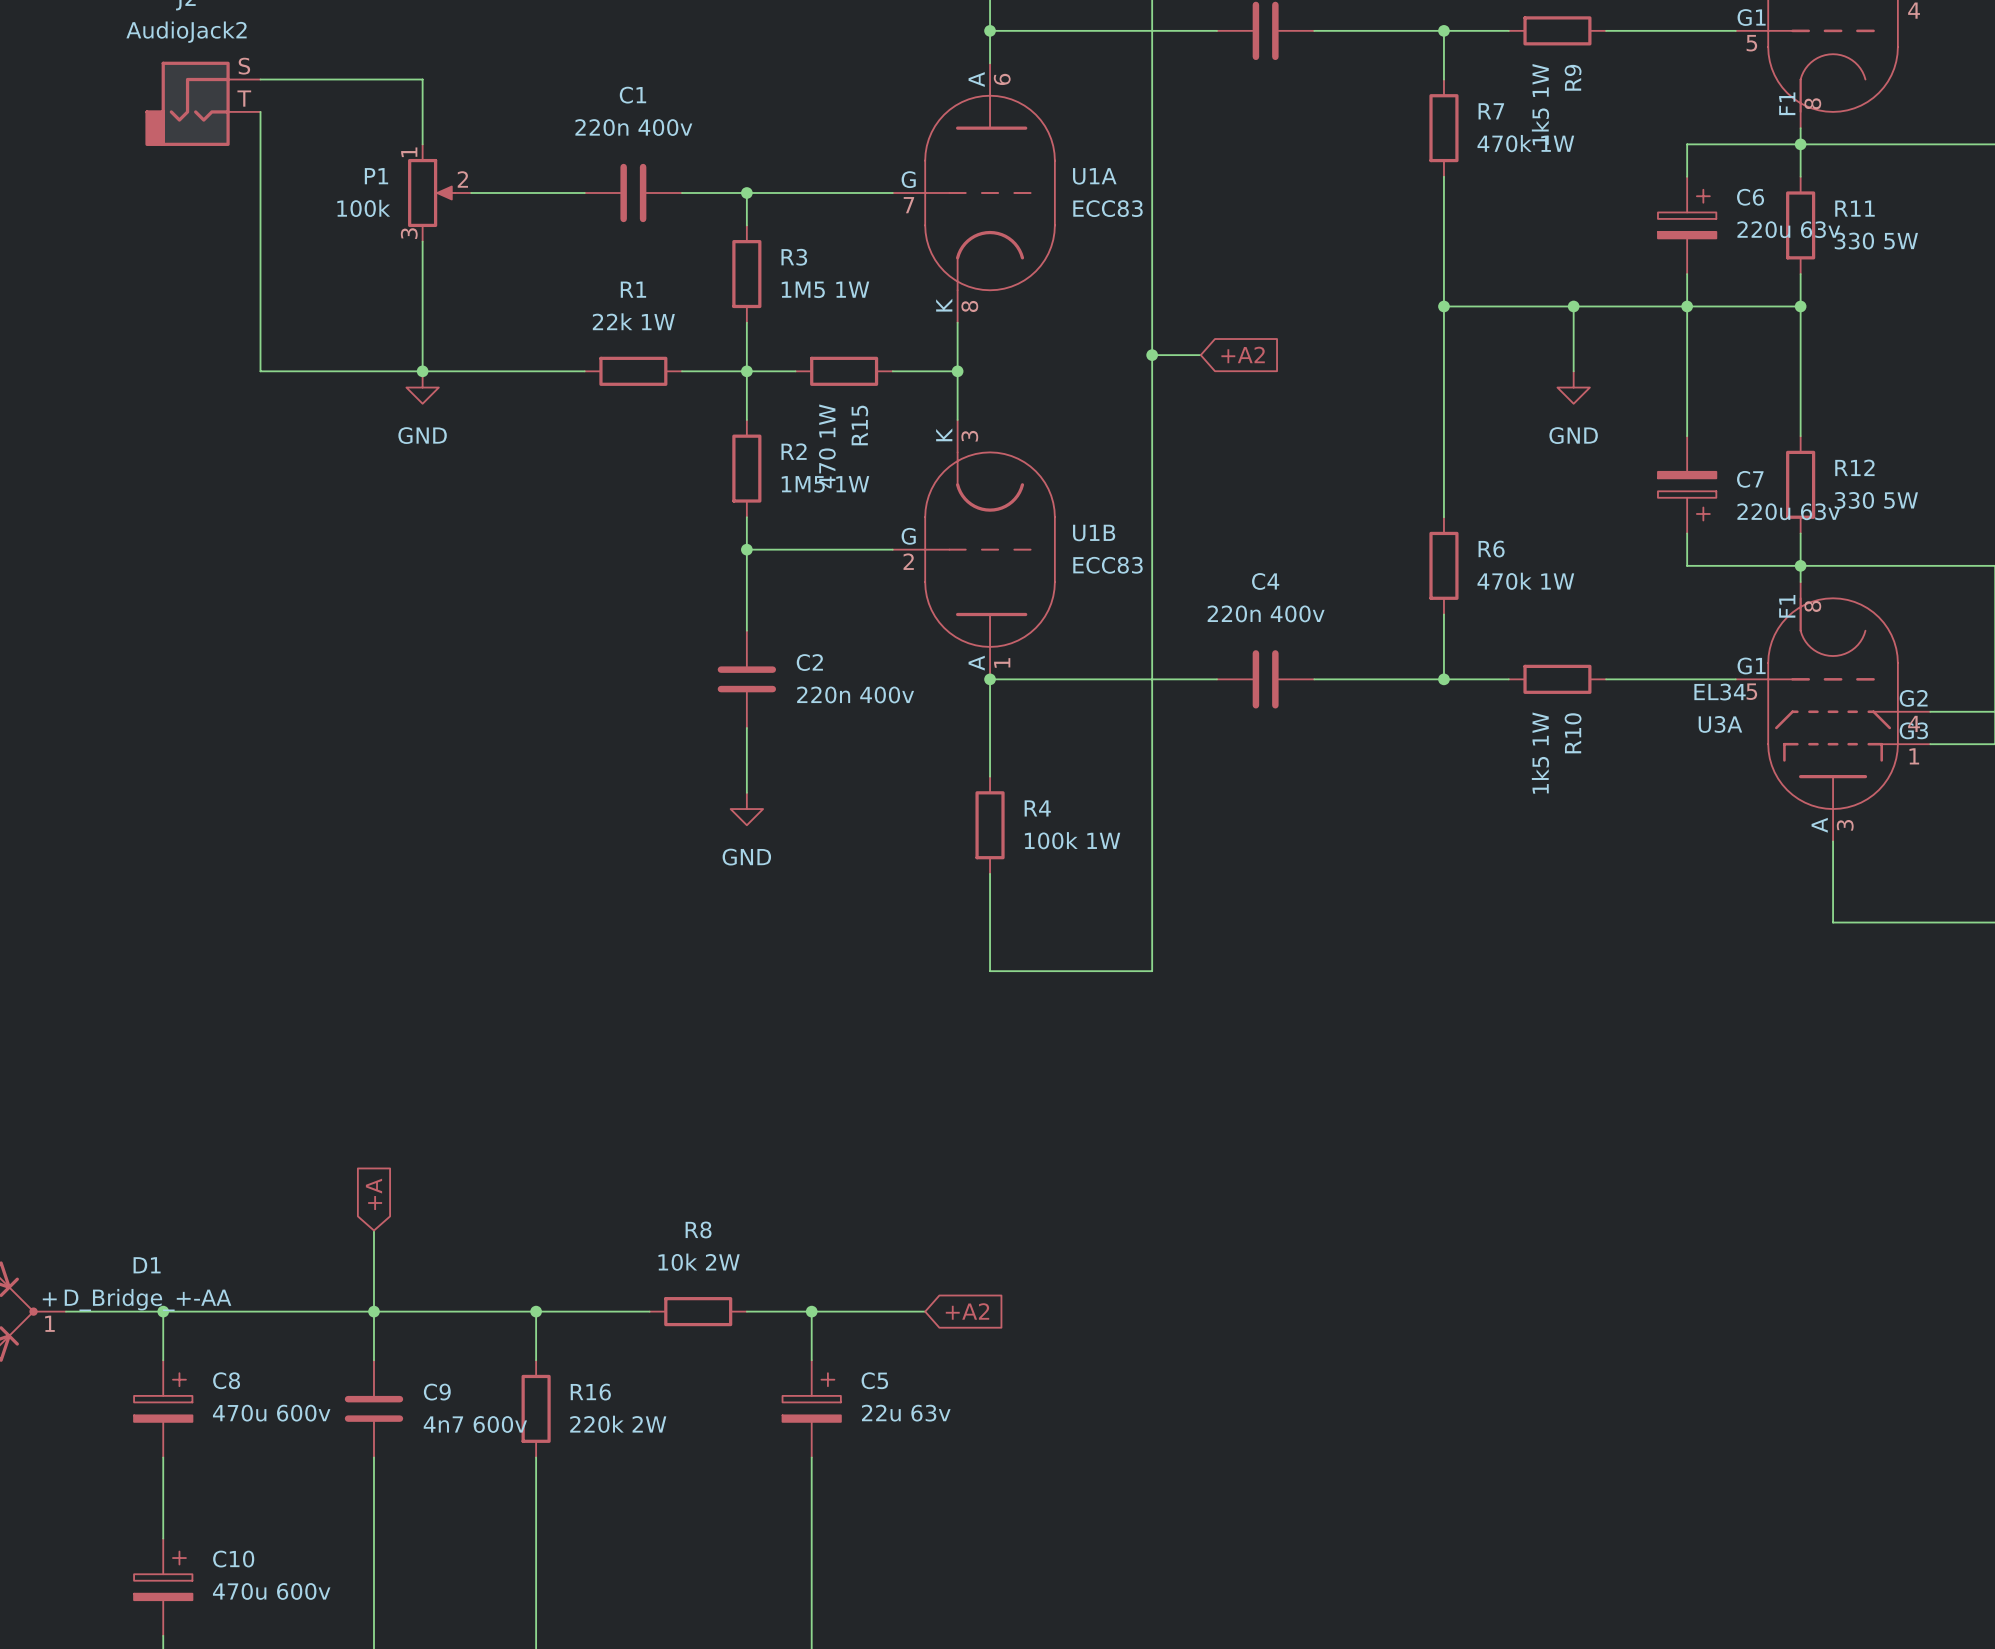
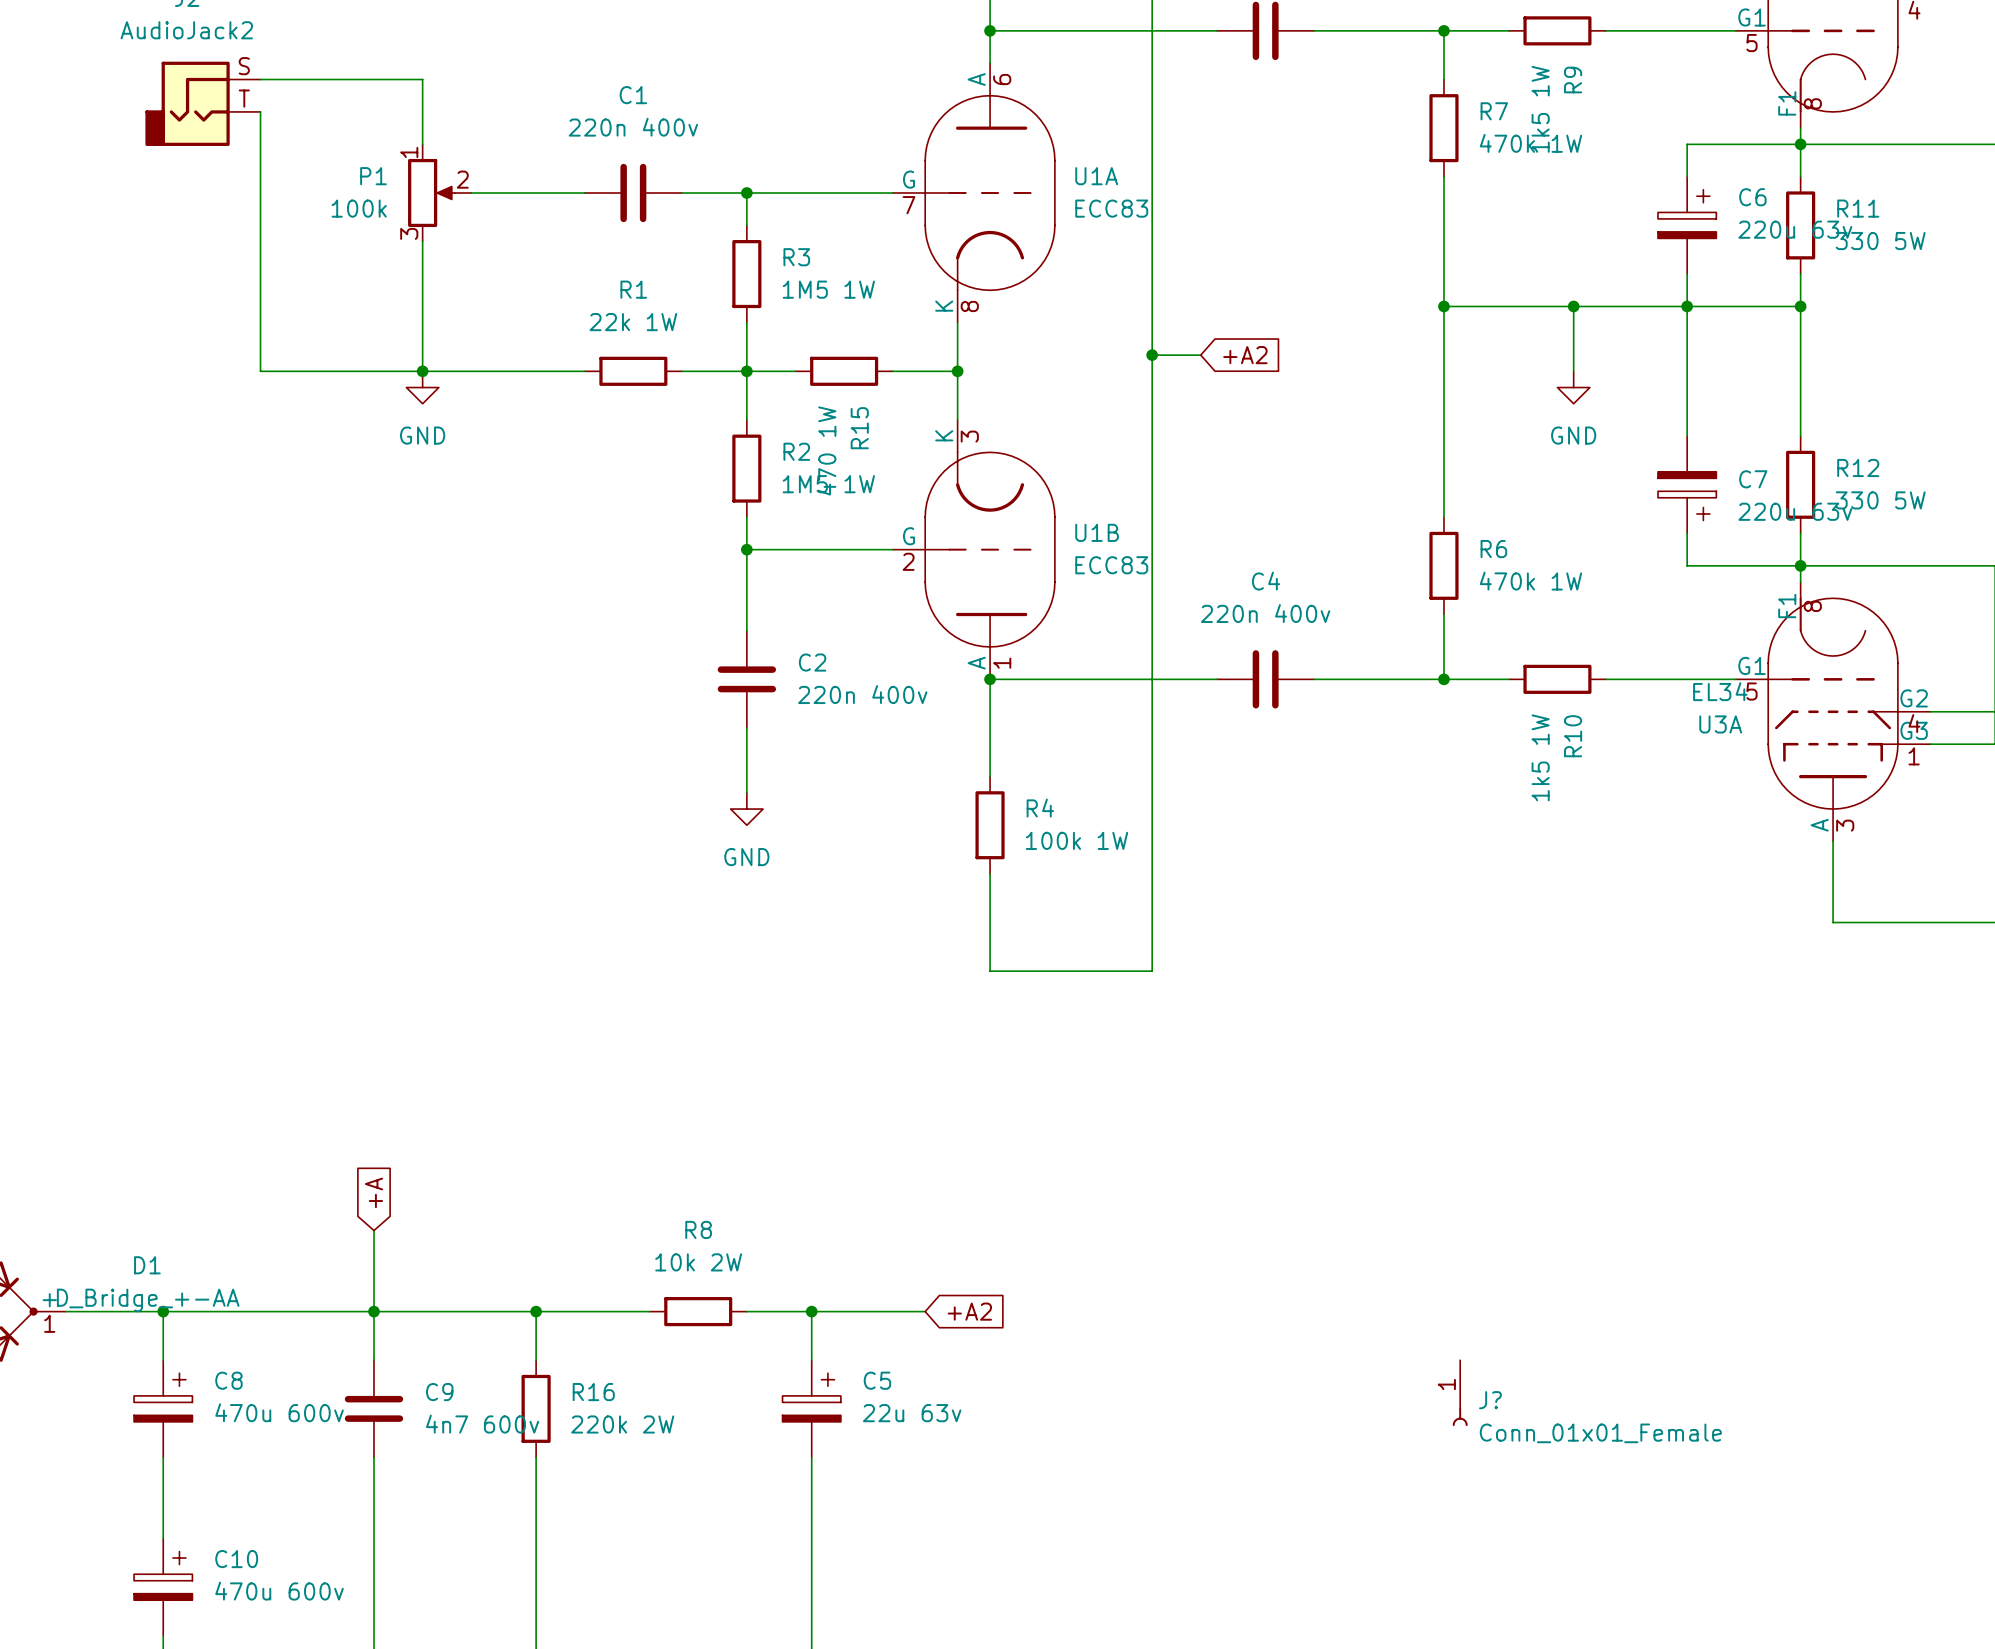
J?: none -> Conn_01x01_Female (1460, 1393)

